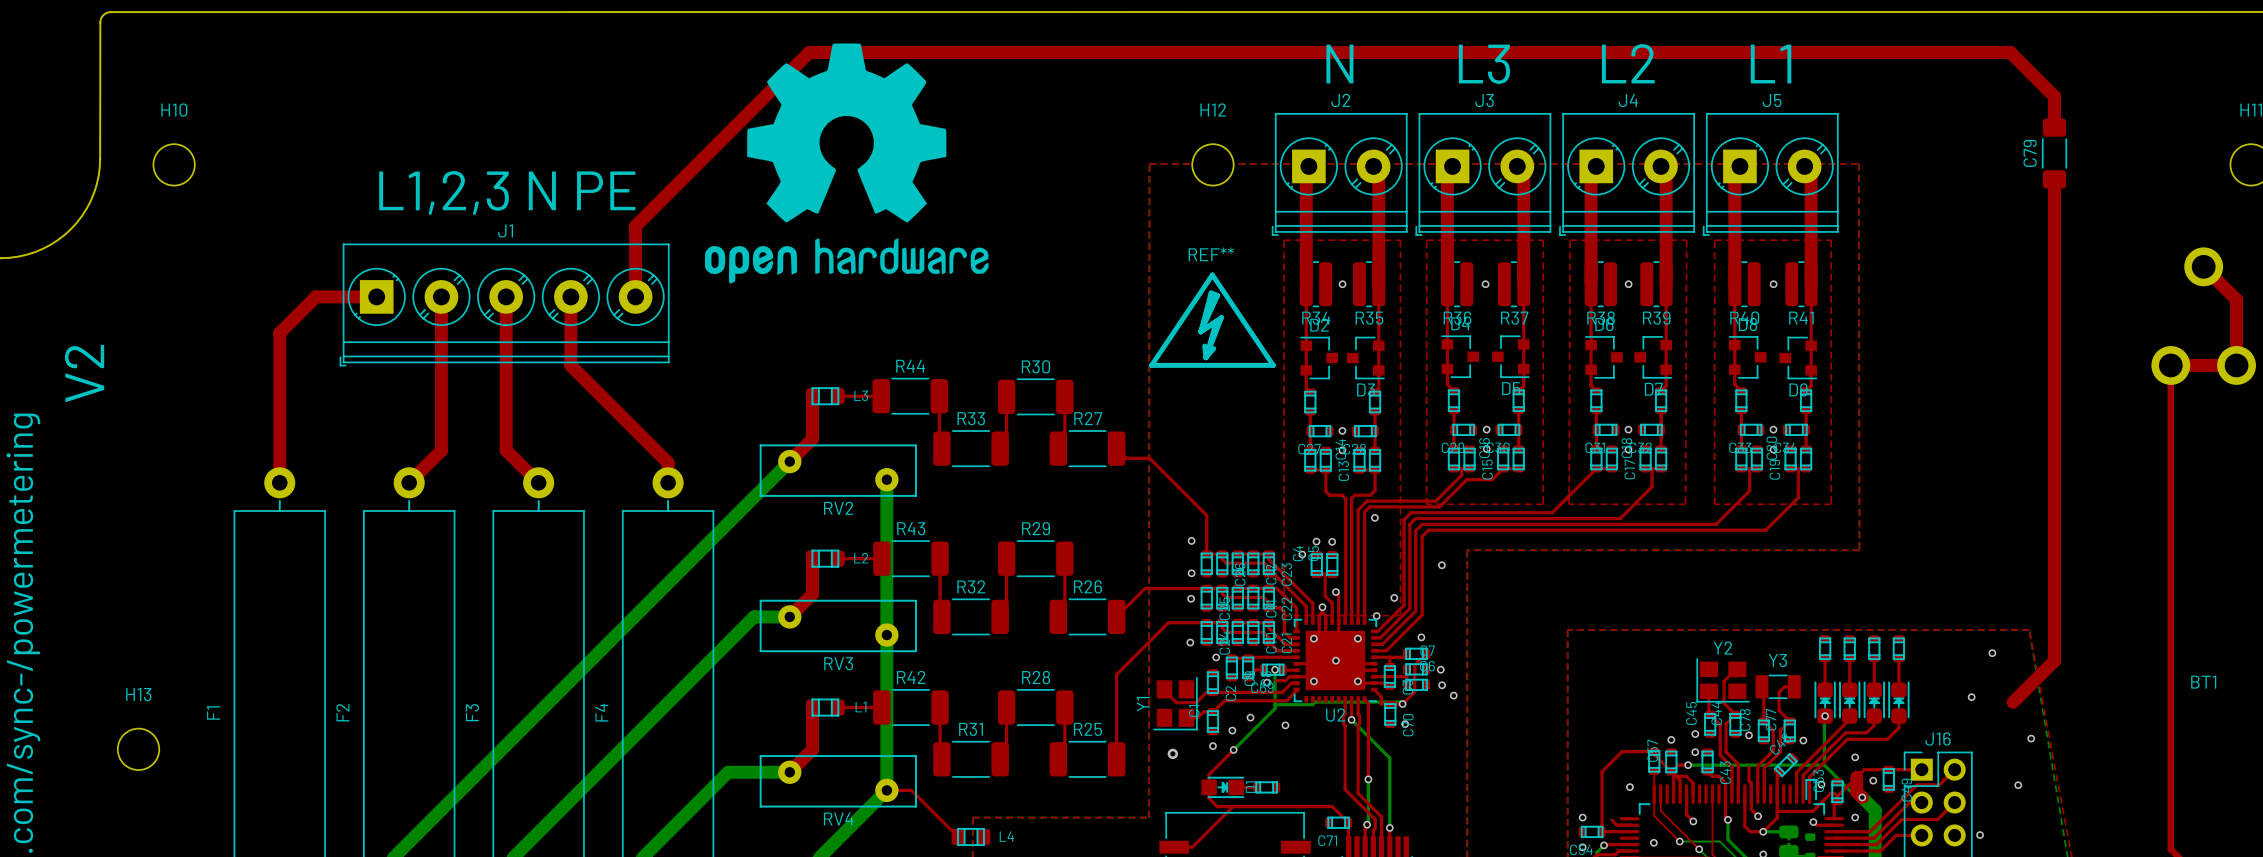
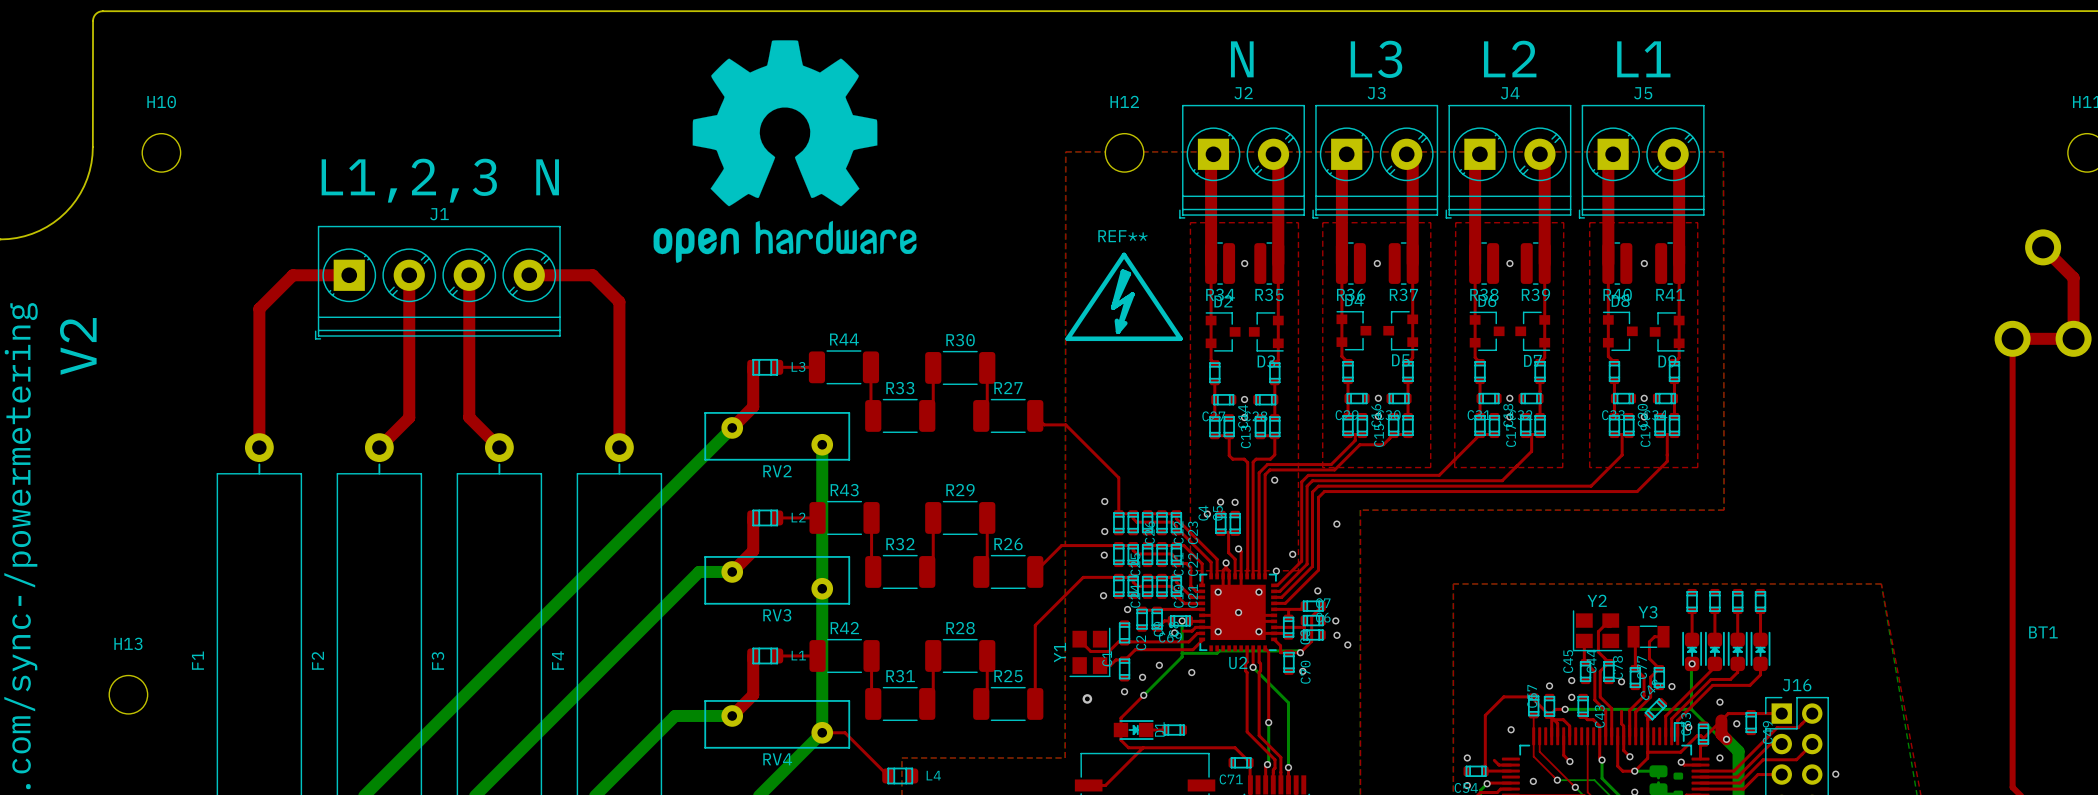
top track: (2054, 127) (2054, 96) (2010, 52) (809, 52) (635, 226) (635, 296) -> none
C79: (2054, 153) -> none
top track: (2054, 179) (2054, 660) (2013, 702) -> none
text: L1,2,3 N PE (507, 192) -> L1,2,3 N (440, 180)
J1 footprint: [339, 243, 670, 367] -> [314, 225, 561, 340]
top track: (570, 296) (570, 365) (668, 462) -> (529, 275) (592, 275) (619, 301) (619, 429)
via: (1992, 653) -> none
via: (1971, 697) -> none
via: (2031, 738) -> none
via: (2018, 785) -> none

